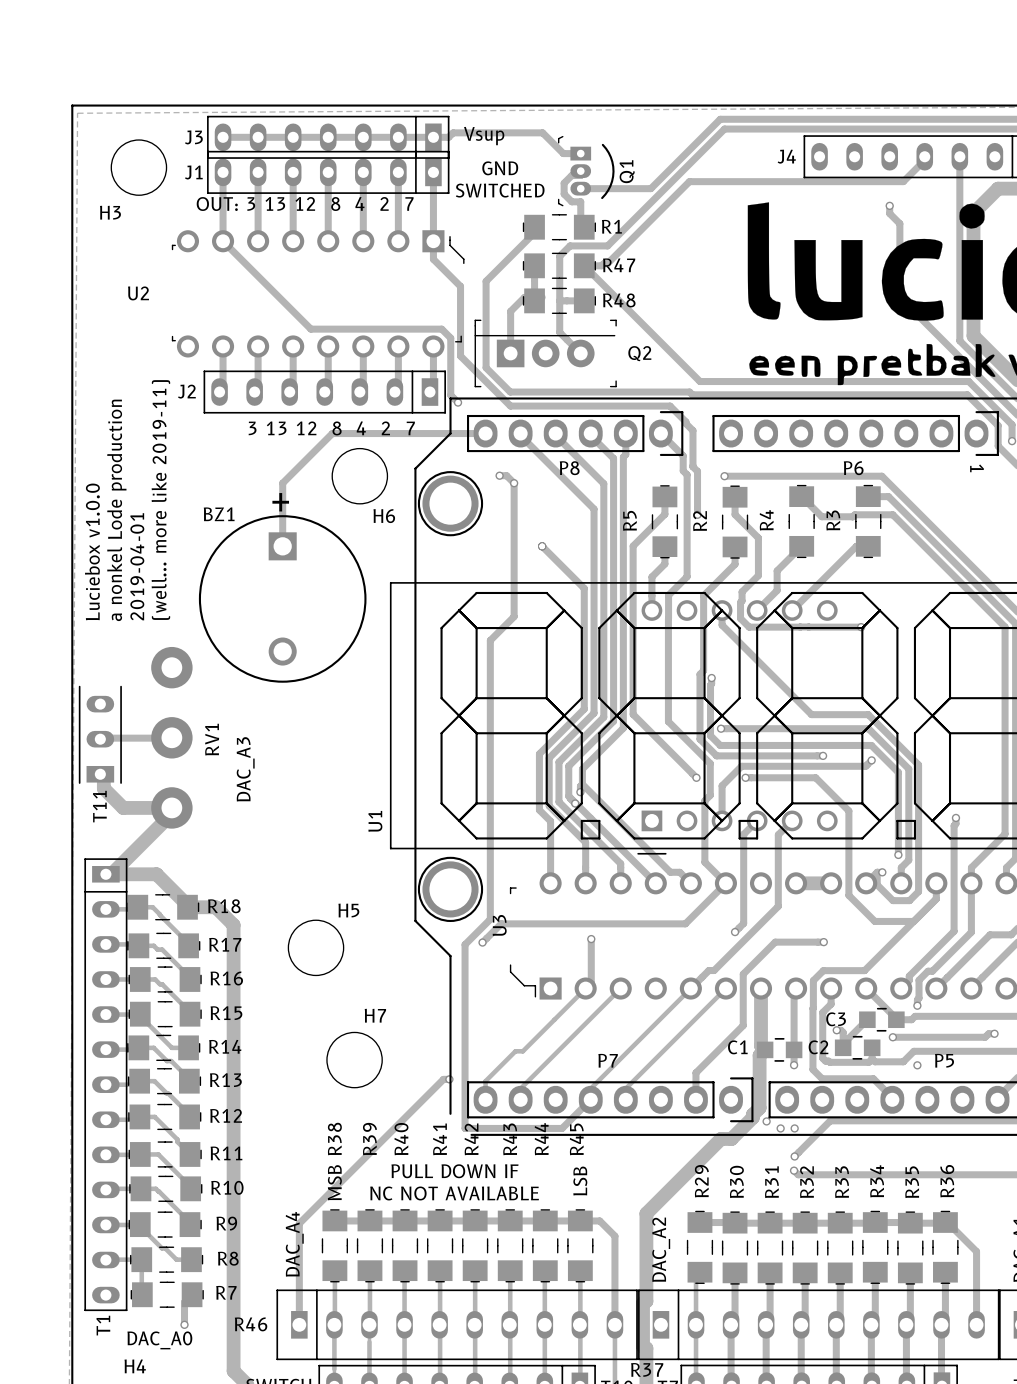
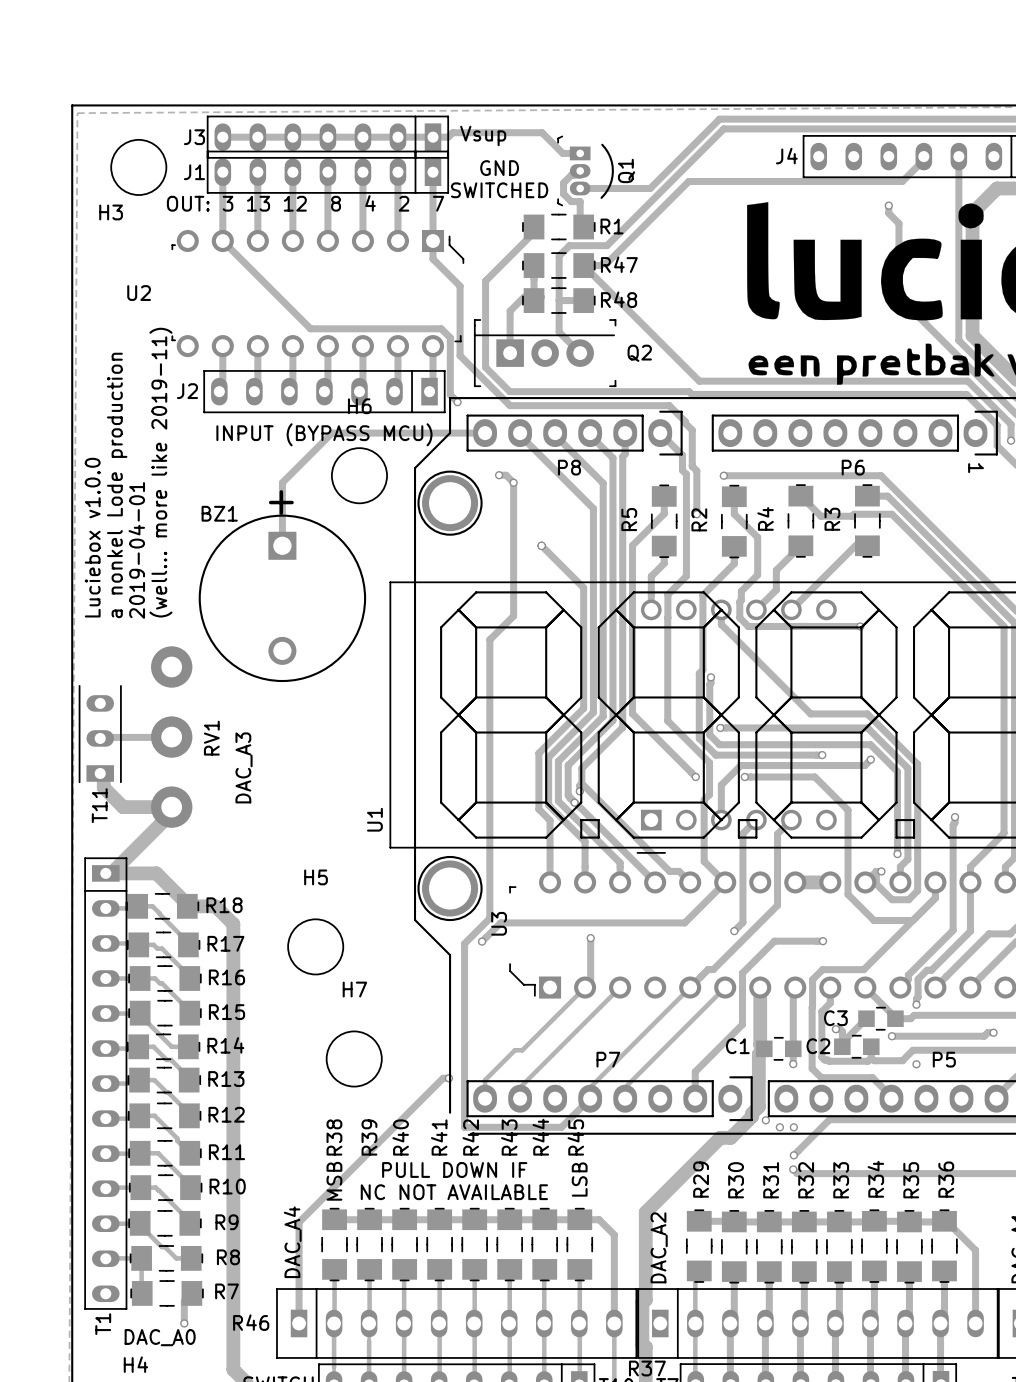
text: 3 13 12 8 4 2 7 (331, 428) -> INPUT (BYPASS MCU) (324, 434)
H6 name position: H6 (384, 516) -> H6 (359, 406)
H5 name position: H5 (348, 910) -> H5 (316, 877)
H7 name position: H7 (375, 1015) -> H7 (354, 989)

